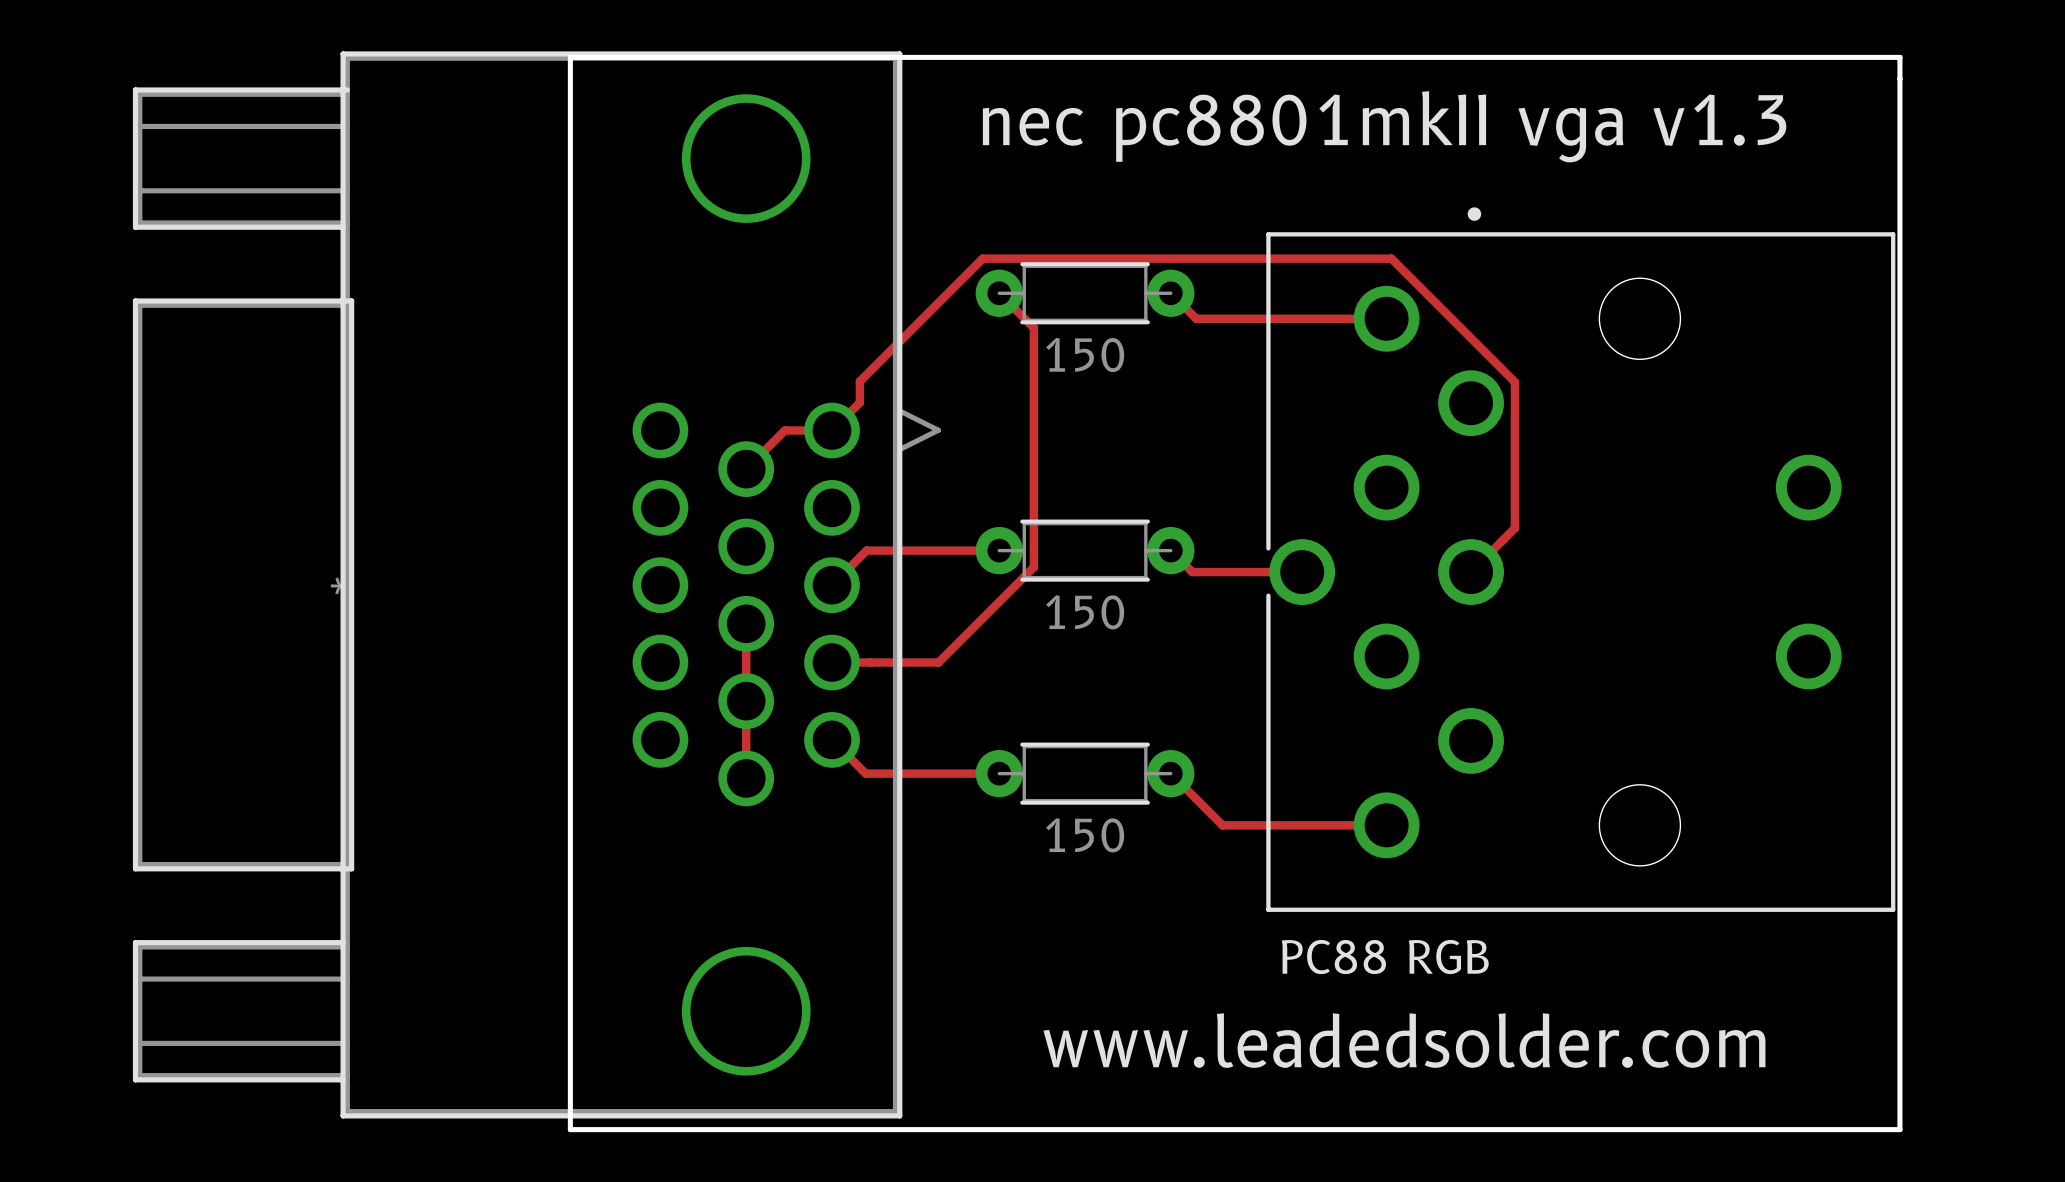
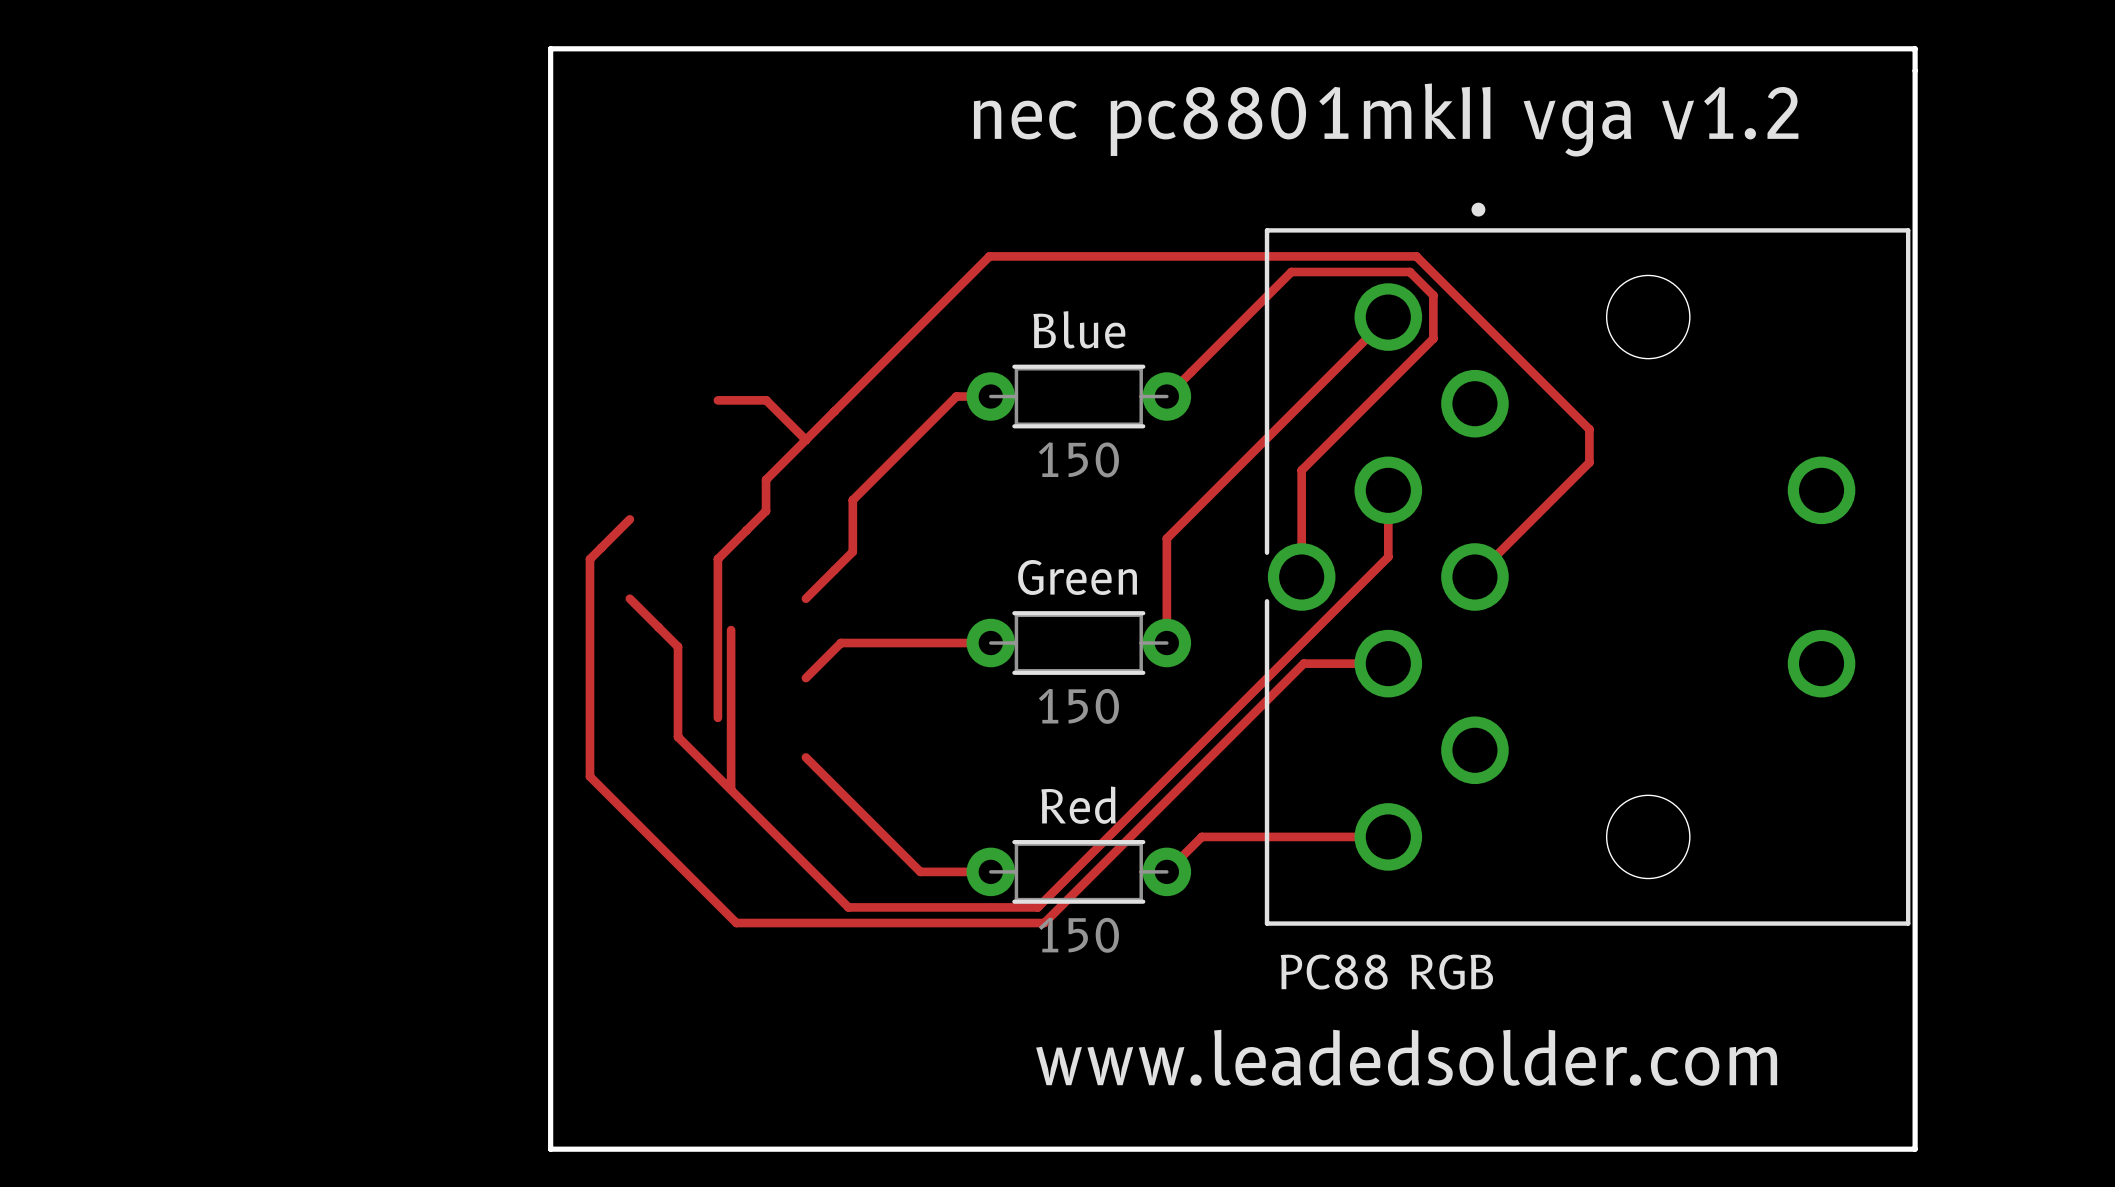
text: nec pc8801mkII vga v1.3 (1384, 126) -> nec pc8801mkII vga v1.2 (1386, 120)
track: (1407, 274) (1391, 258) (982, 258) (859, 381) (859, 402) (832, 430) (784, 430) (746, 469) -> (1409, 271) (1291, 271) (1166, 396)
track: (999, 293) (1033, 327) (1033, 567) (938, 662) (832, 662) -> none
part: 150 (1085, 293) -> none
track: (1170, 293) (1196, 318) (1386, 318) -> (1166, 643) (1166, 538) (1388, 317)
track: (1430, 297) (1514, 382) (1514, 528) -> (1433, 295) (1433, 338) (1301, 470) (1301, 576)
track: none -> (990, 396) (956, 396) (852, 500) (852, 551) (805, 598)
Blue: none -> 150 (1078, 396)
track: none -> (717, 400) (766, 400) (805, 439)
track: none -> (1388, 490) (1388, 557) (1037, 907) (848, 907) (678, 736) (678, 646) (629, 598)
track: none -> (629, 519) (589, 559) (589, 776) (736, 923) (1044, 923) (1303, 663) (1388, 663)
track: none -> (1520, 531) (1589, 462) (1589, 429) (1416, 256) (989, 256) (766, 479) (766, 510) (717, 559) (717, 717)
track: (999, 550) (866, 550) (832, 585) -> none
part: 150 (1085, 550) -> none
track: (1170, 550) (1192, 572) (1302, 572) -> none
part: (536, 584) -> none
track: none -> (990, 643) (841, 643) (805, 678)
Green: none -> 150 (1078, 643)
track: (832, 739) (865, 773) (999, 773) -> none
track: none -> (805, 757) (920, 871) (990, 871)
part: 150 (1085, 773) -> none
track: (1170, 773) (1222, 825) -> (1166, 871) (1201, 836) (1219, 836)
Red: none -> 150 (1078, 871)

